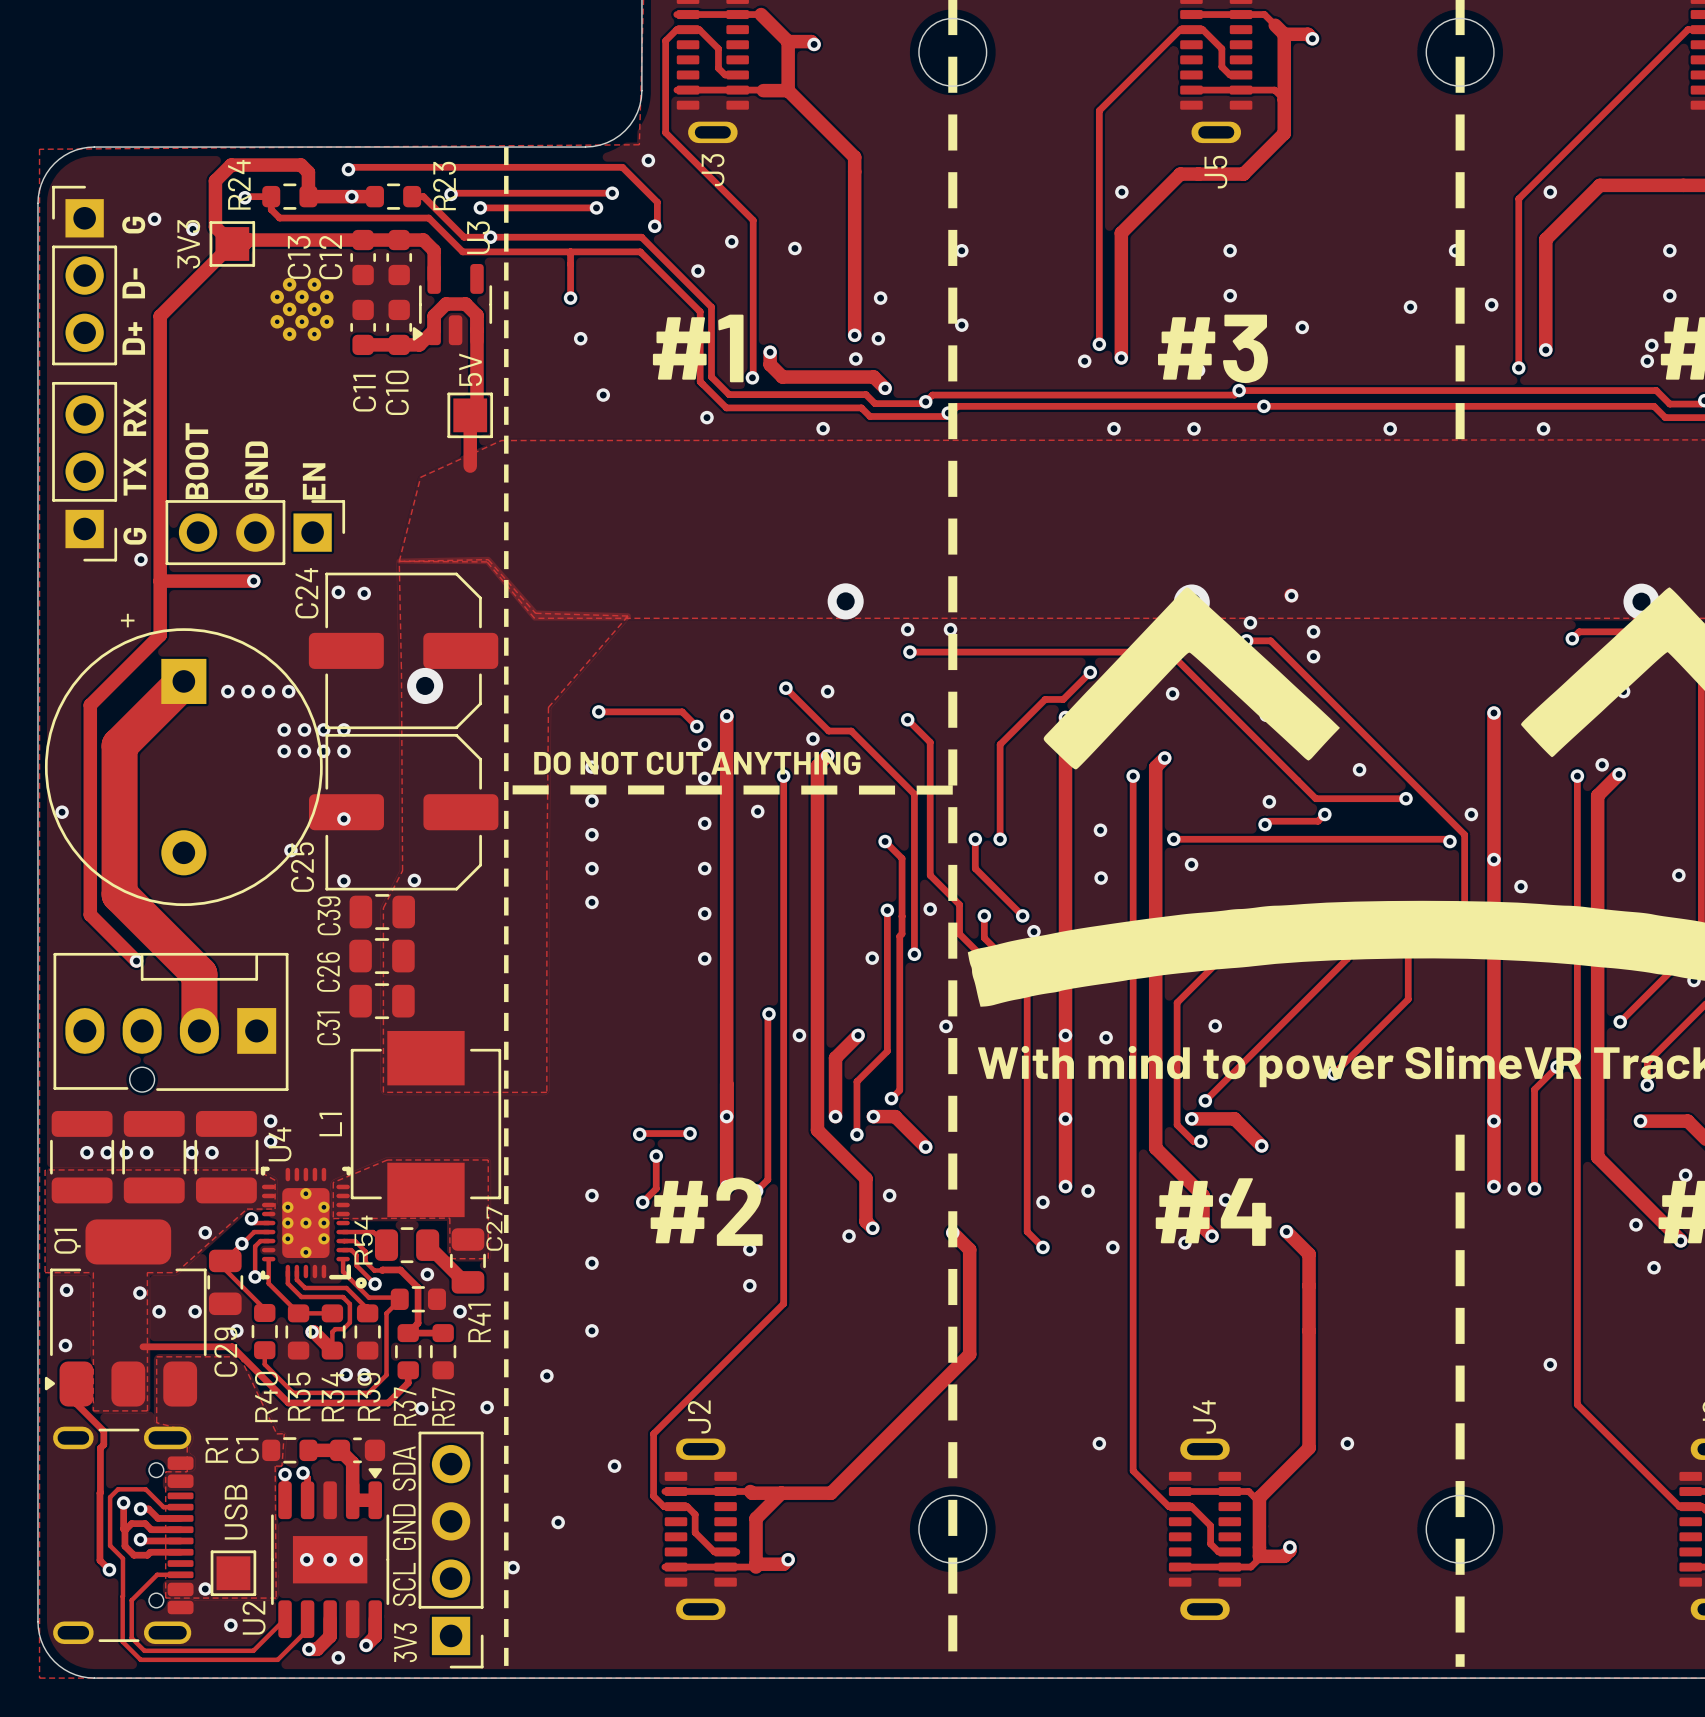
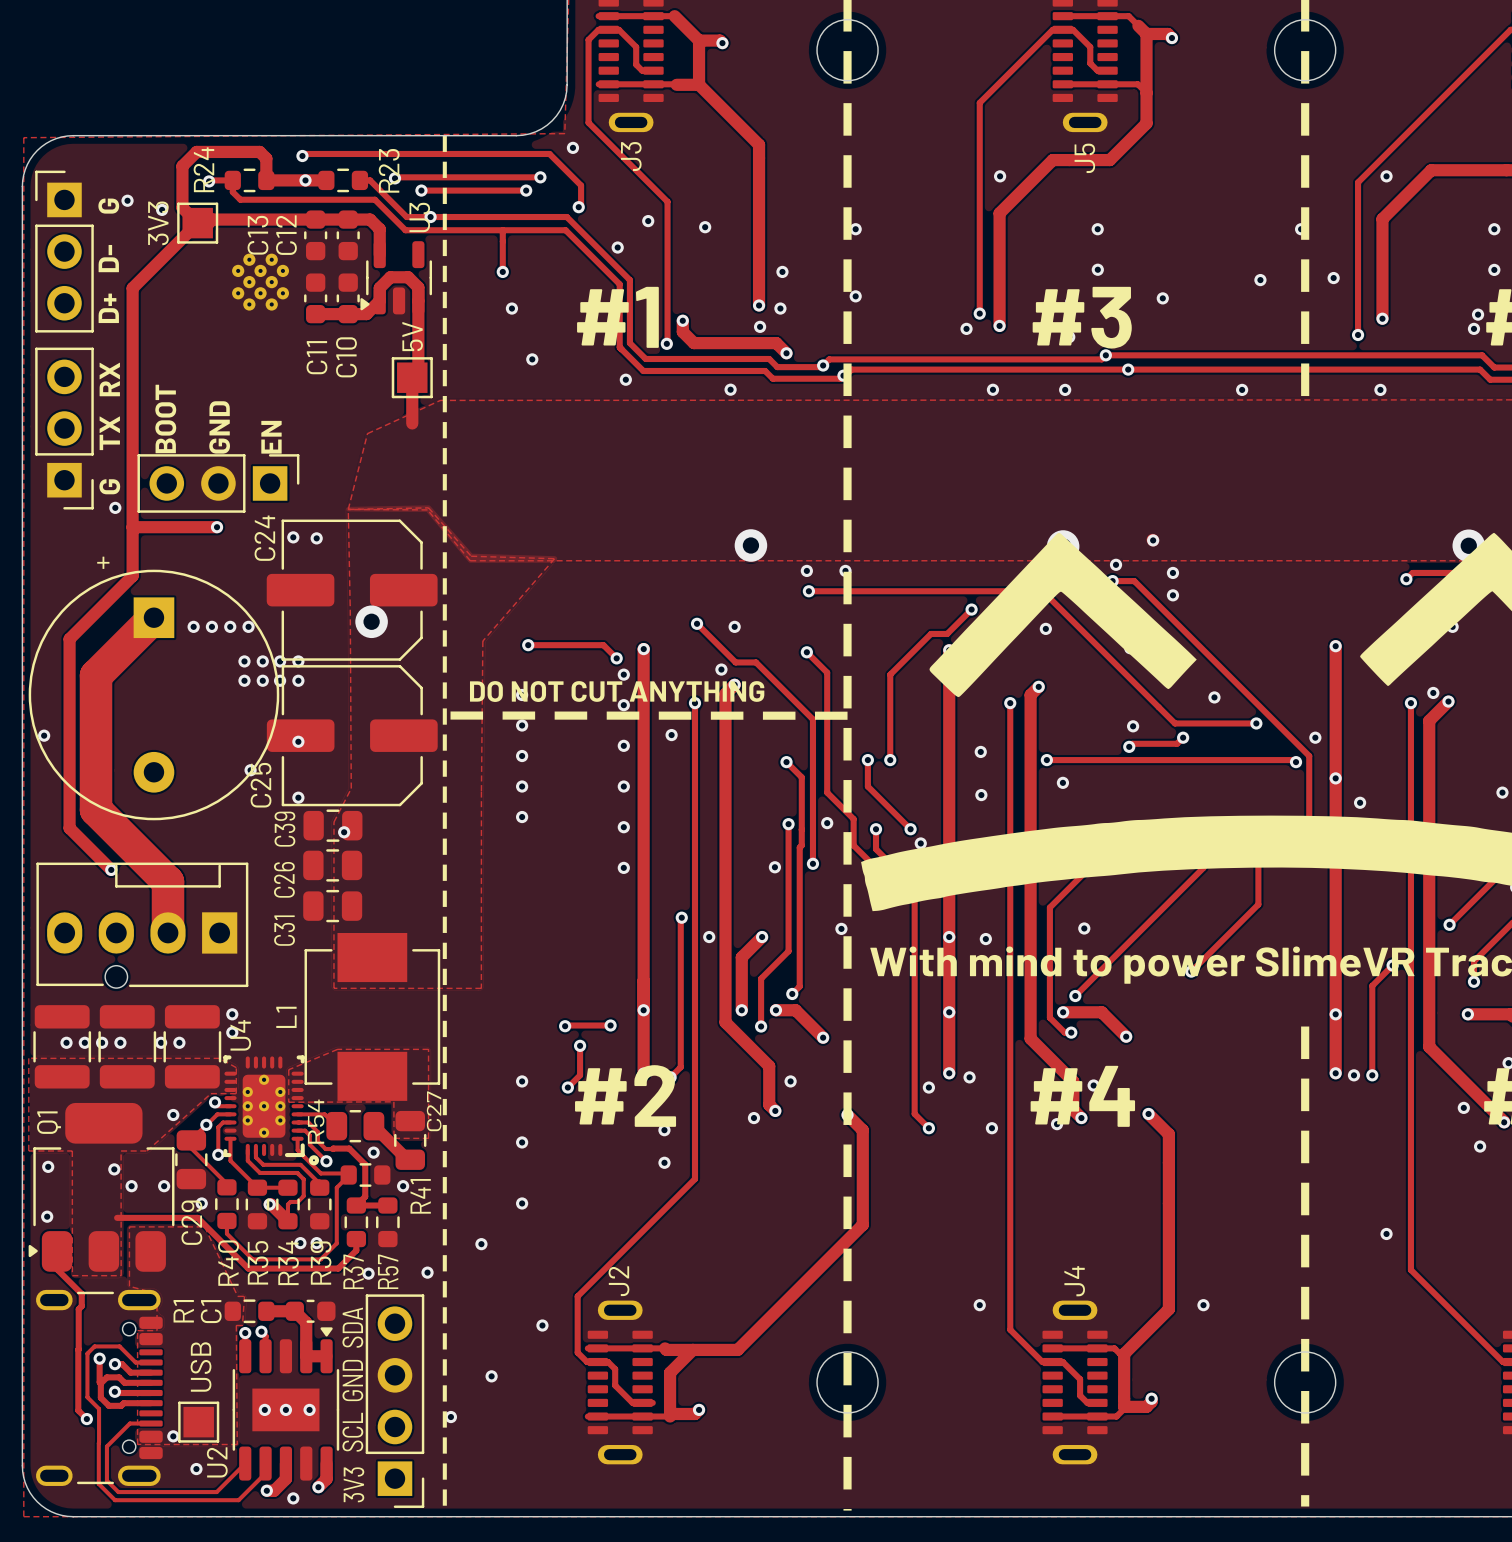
via position: (414, 880) -> (344, 832)

